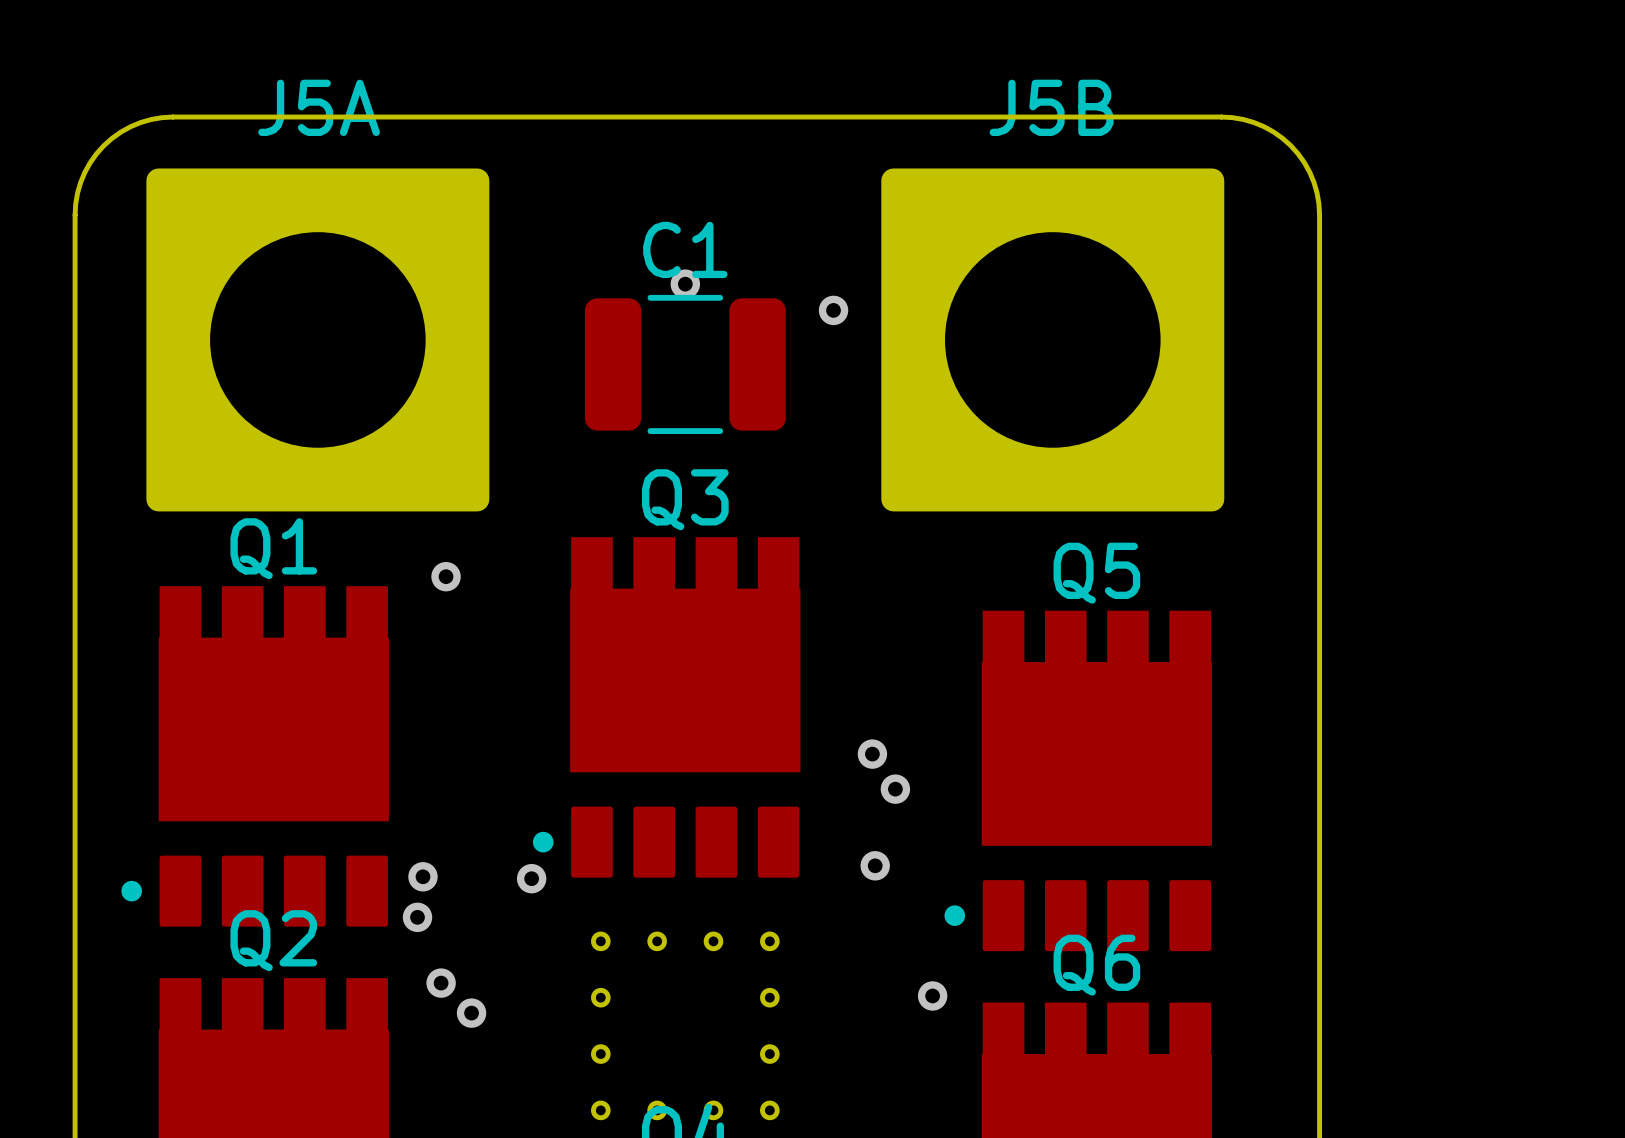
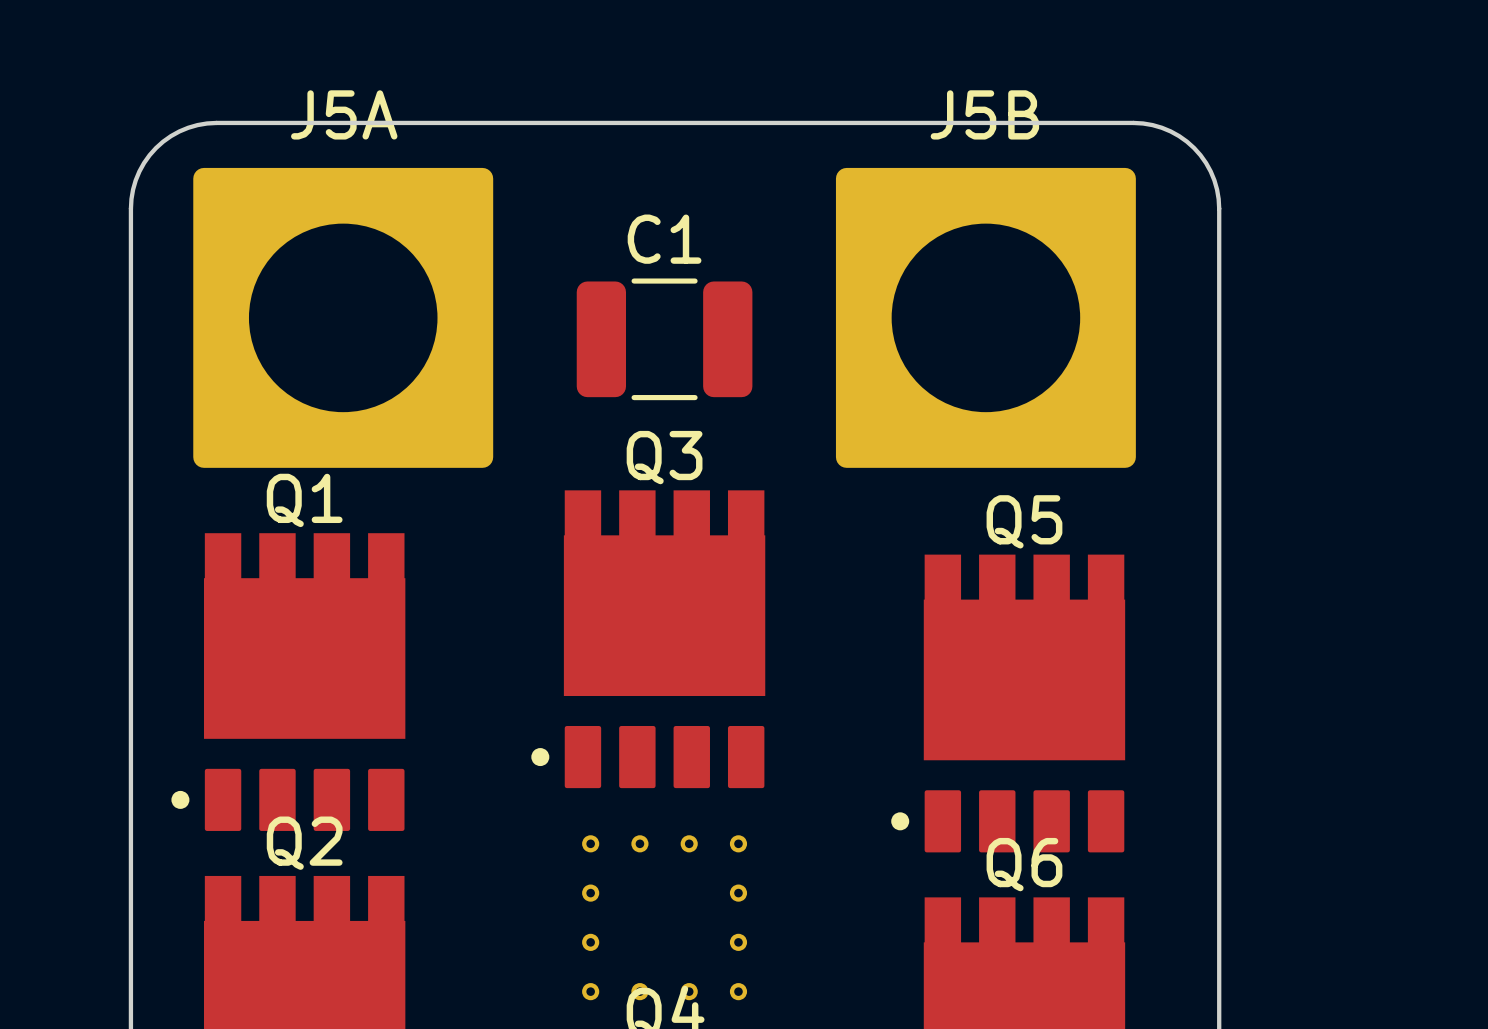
via: (685, 284) -> none
via: (833, 310) -> none
via: (446, 576) -> none
via: (872, 754) -> none
via: (895, 789) -> none
via: (875, 865) -> none
via: (422, 876) -> none
via: (531, 878) -> none
via: (417, 917) -> none
via: (441, 983) -> none
via: (932, 995) -> none
via: (471, 1013) -> none

